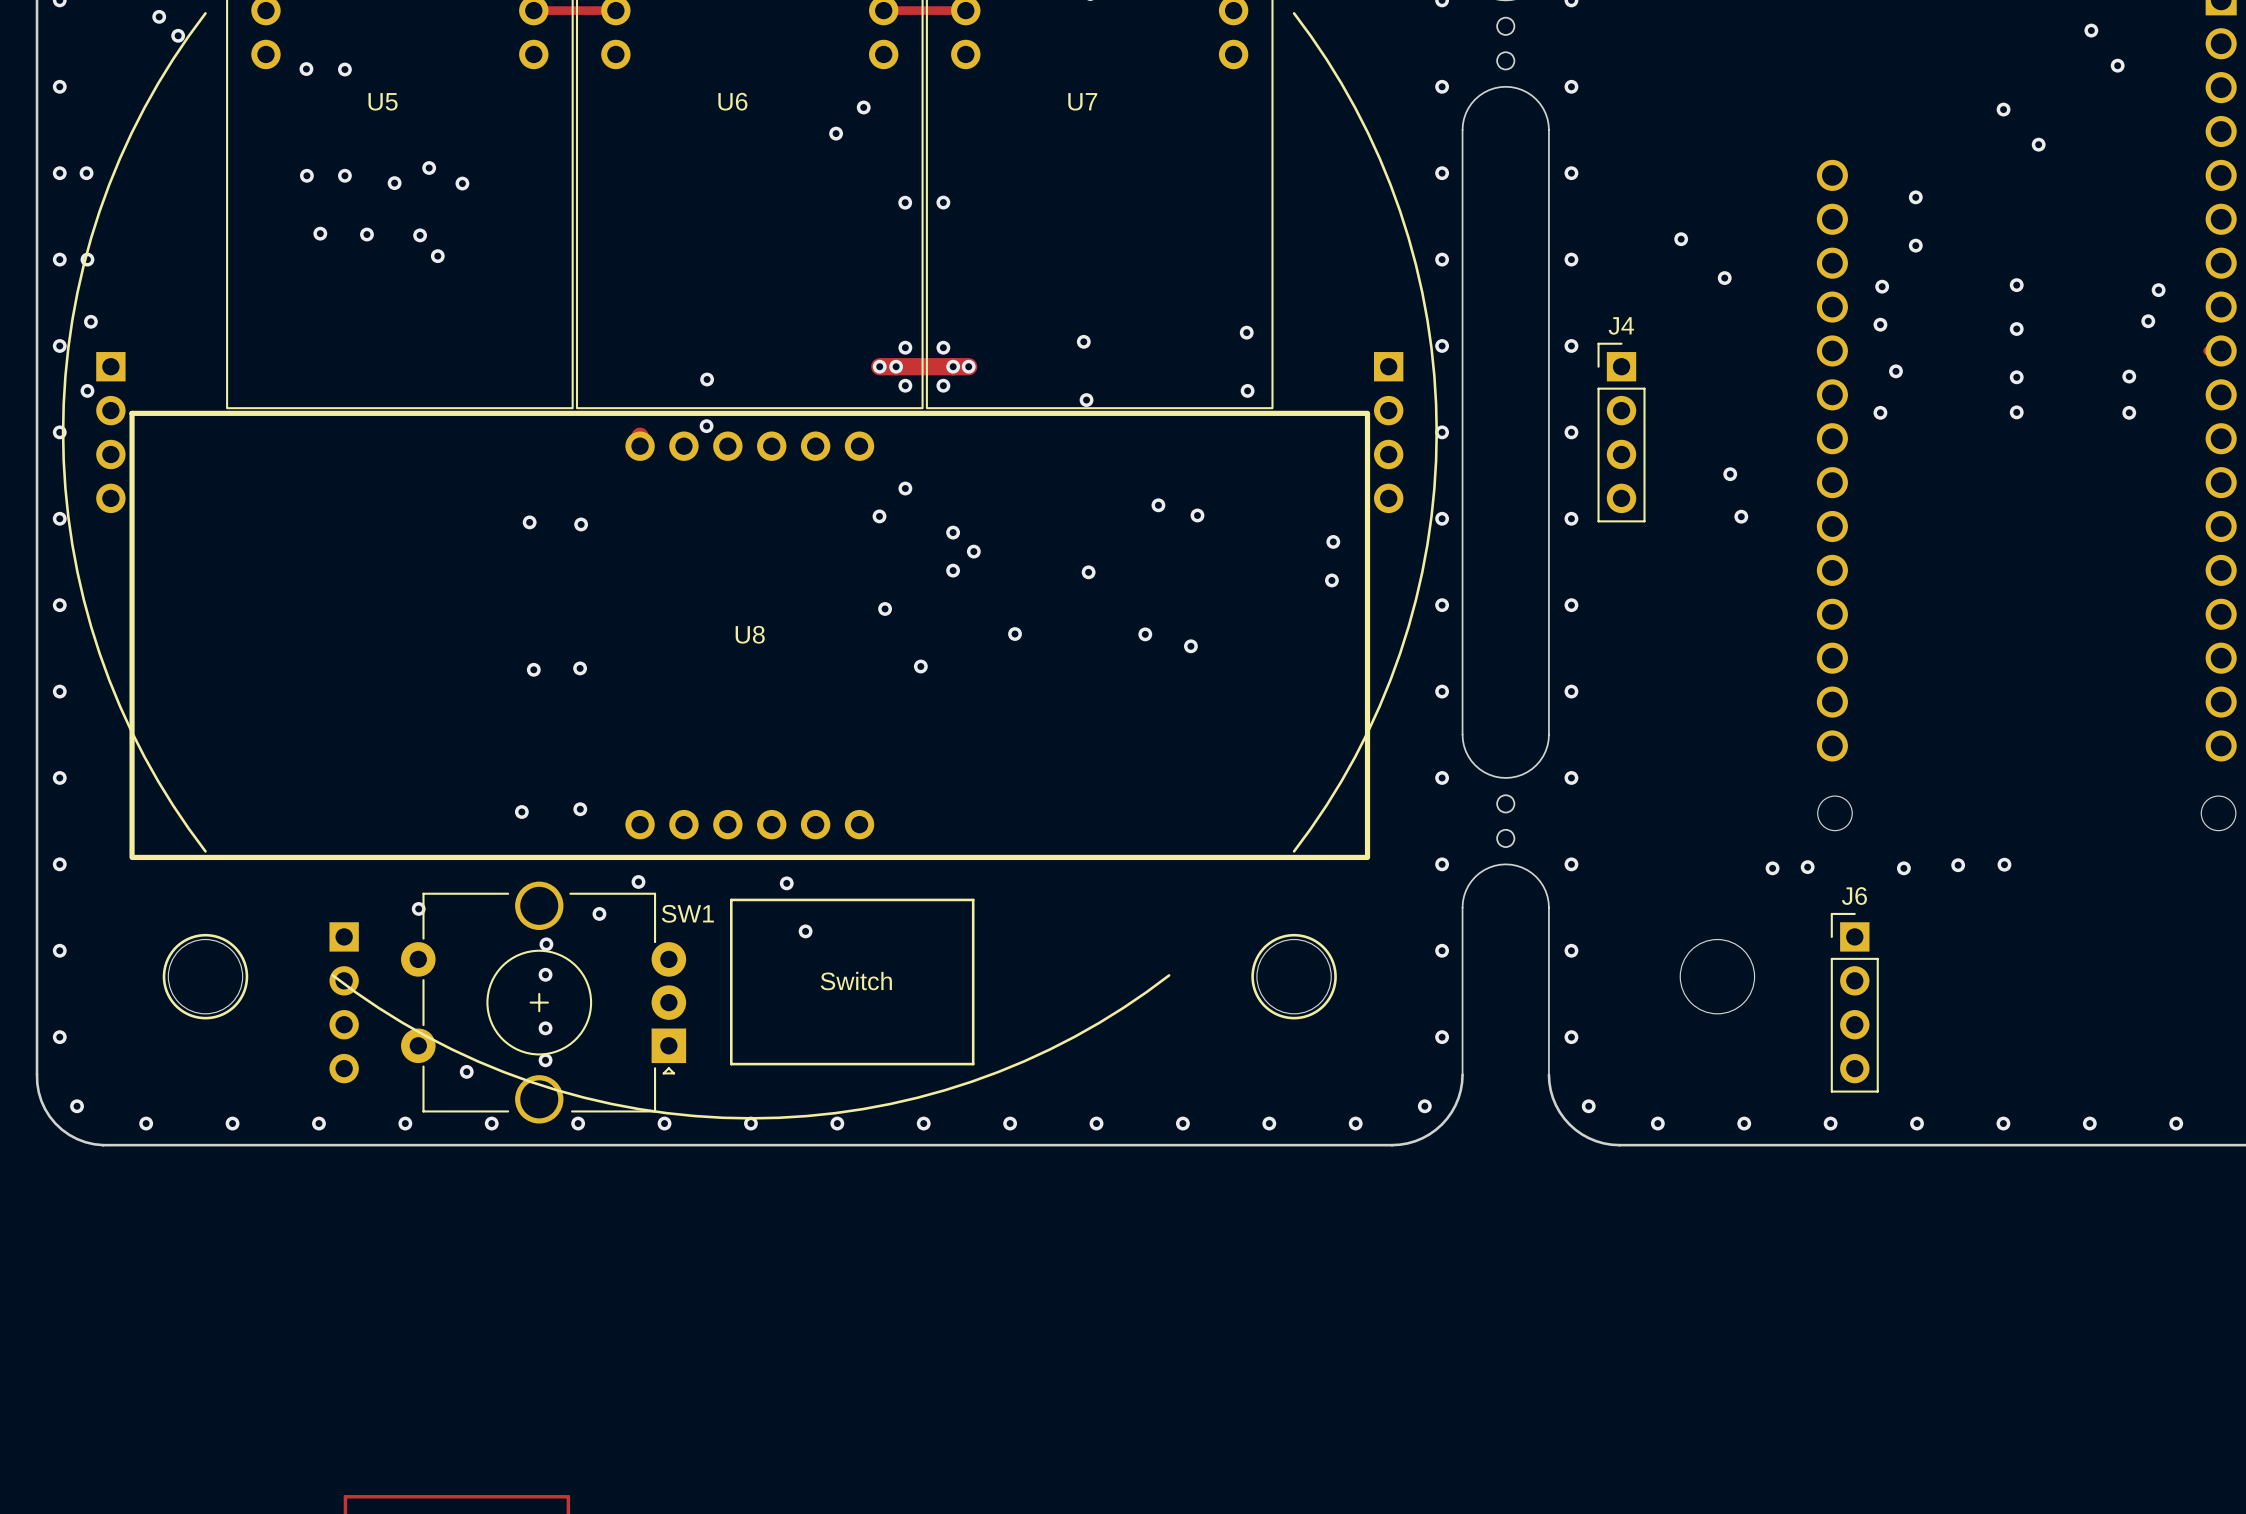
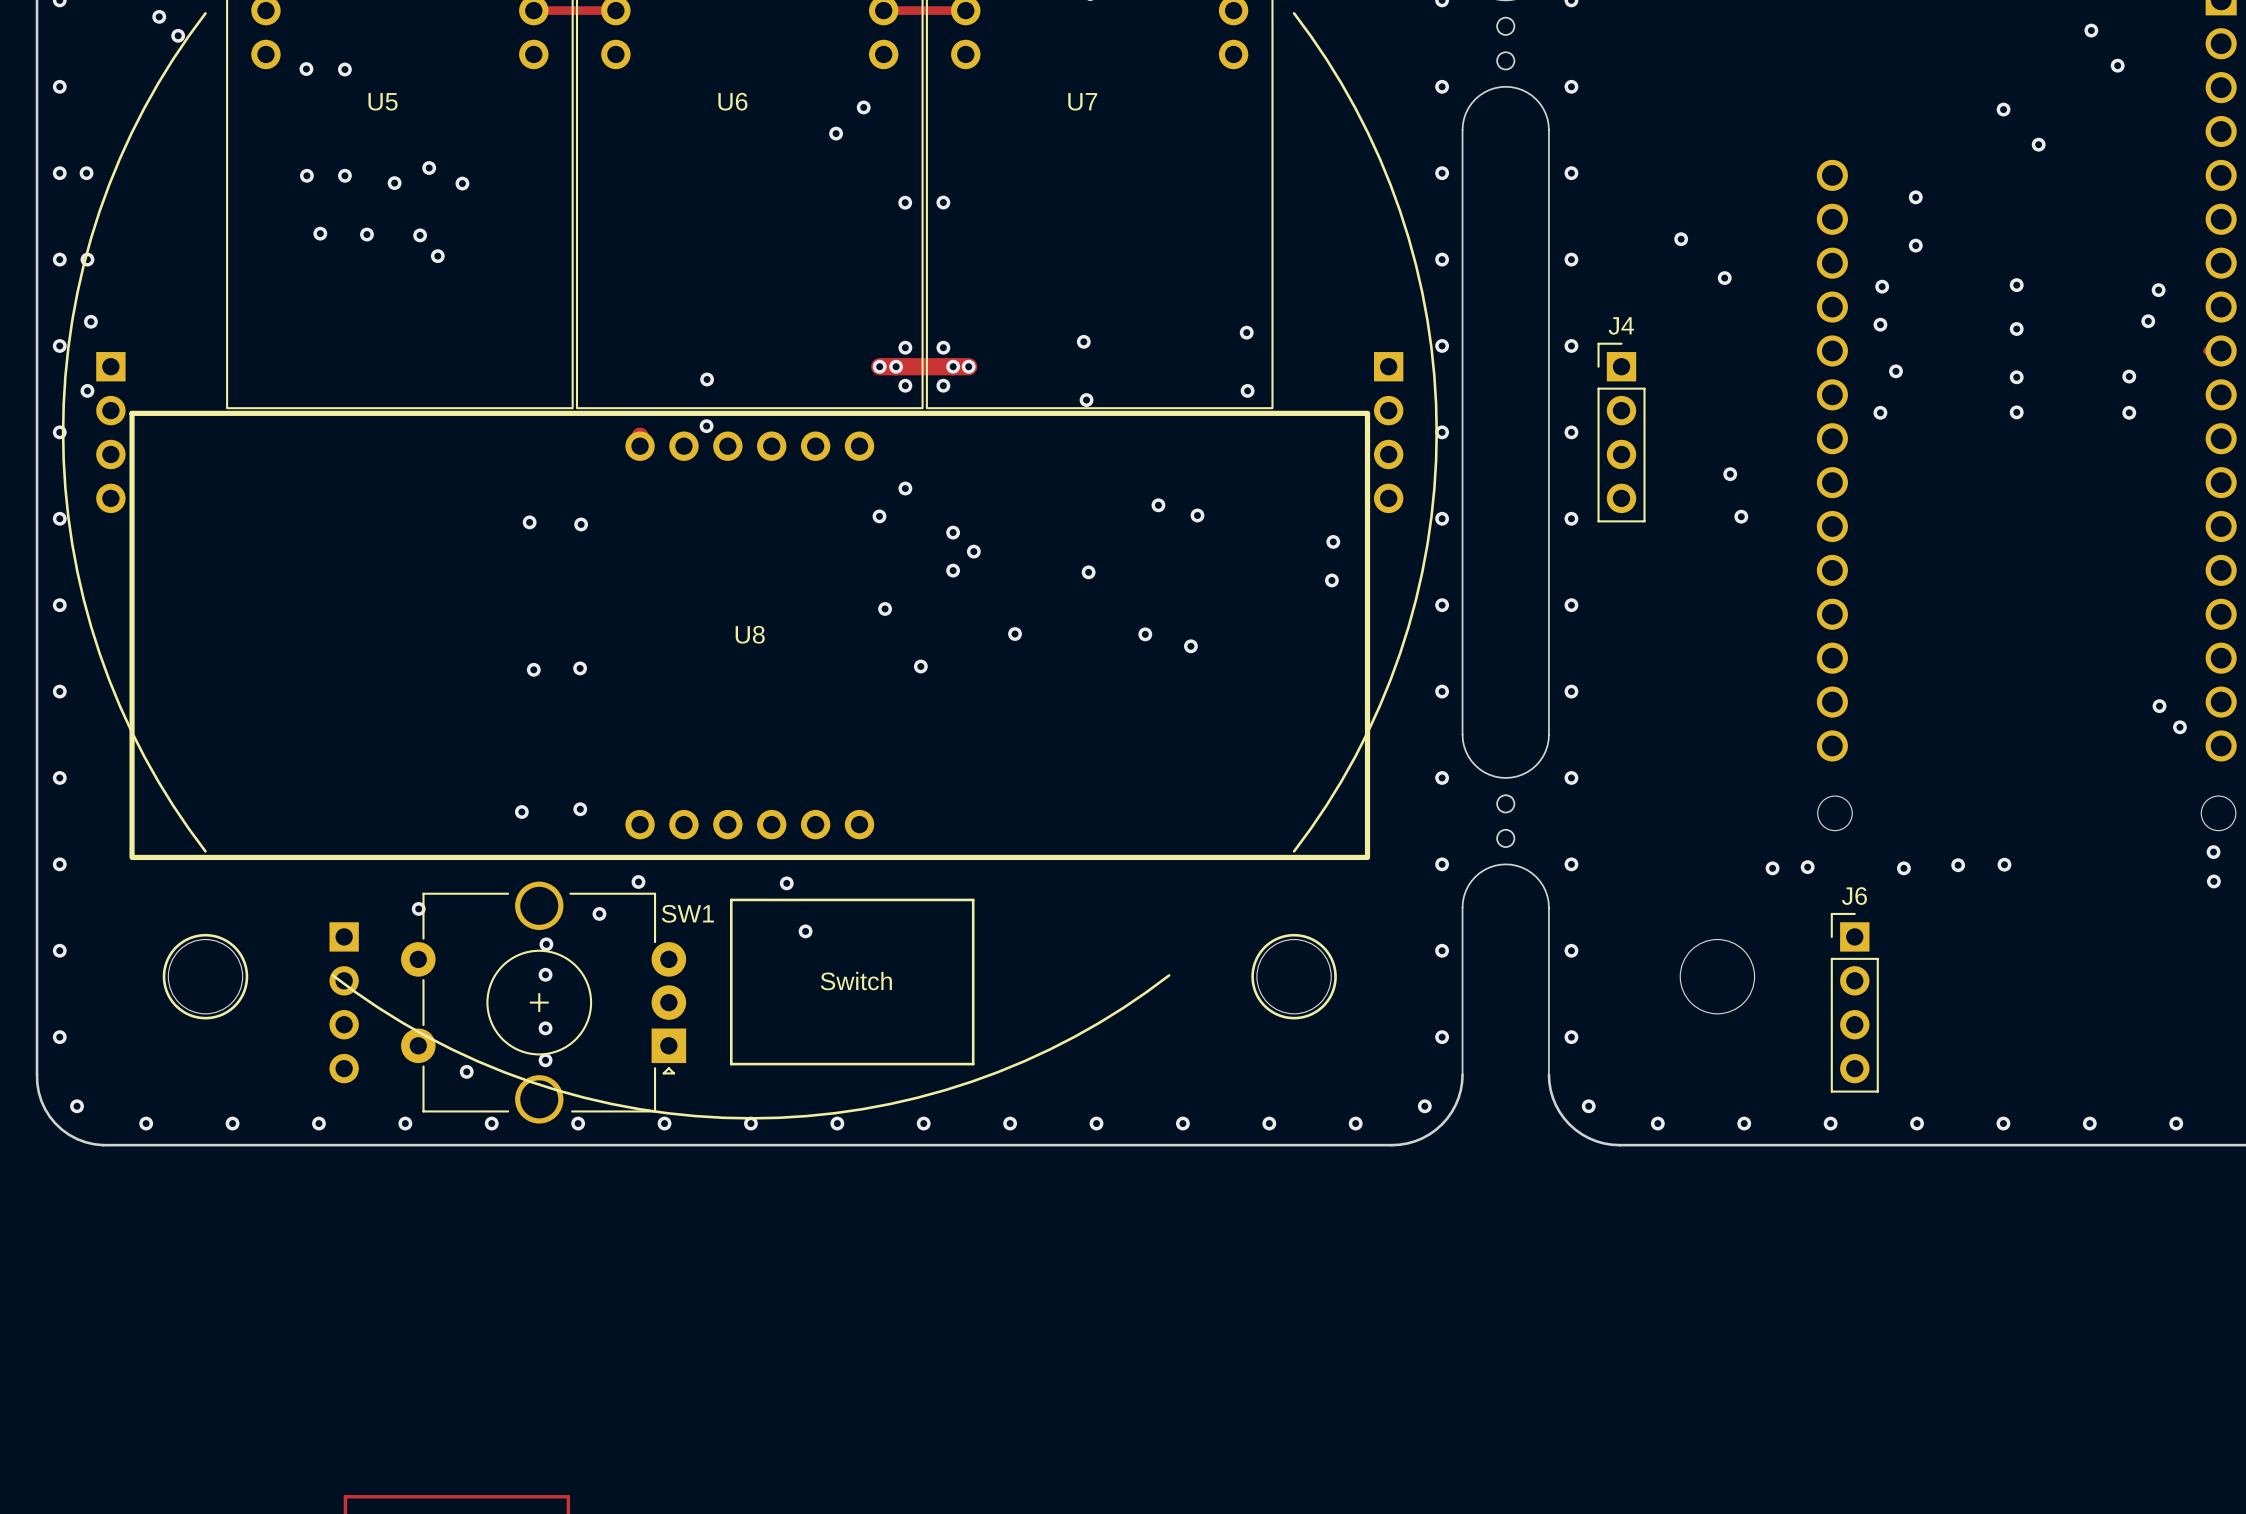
via: none -> (2159, 706)
via: none -> (2179, 727)
via: none -> (2213, 852)
via: none -> (2213, 881)

